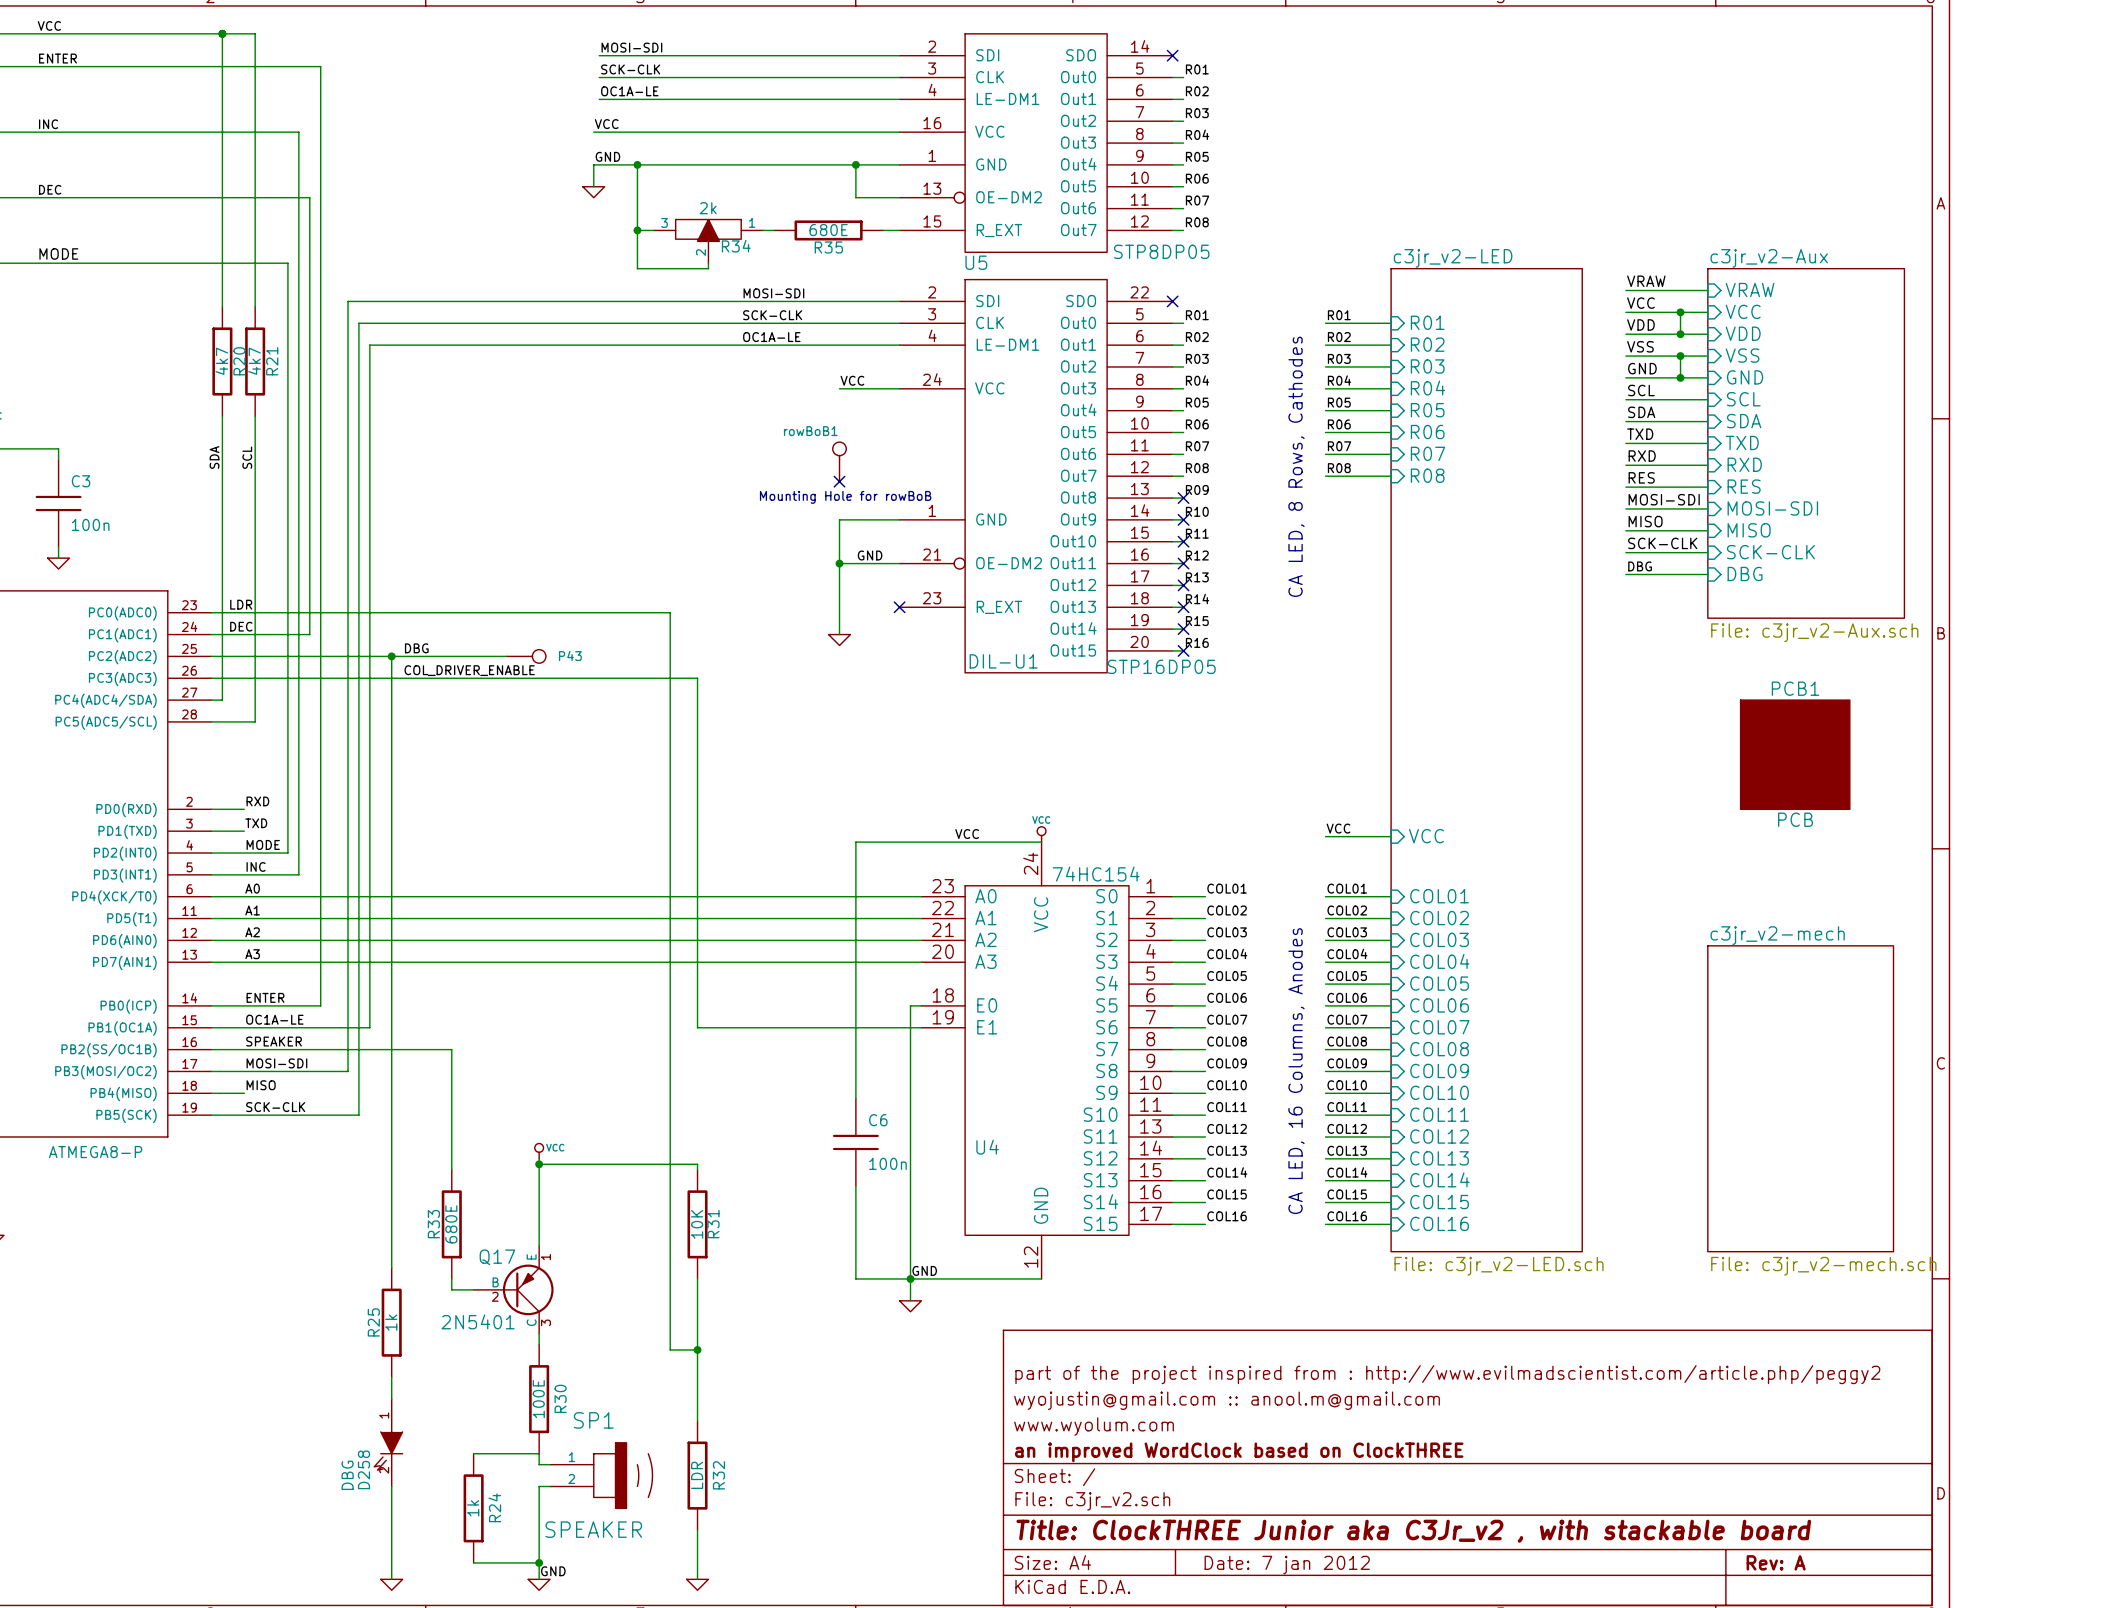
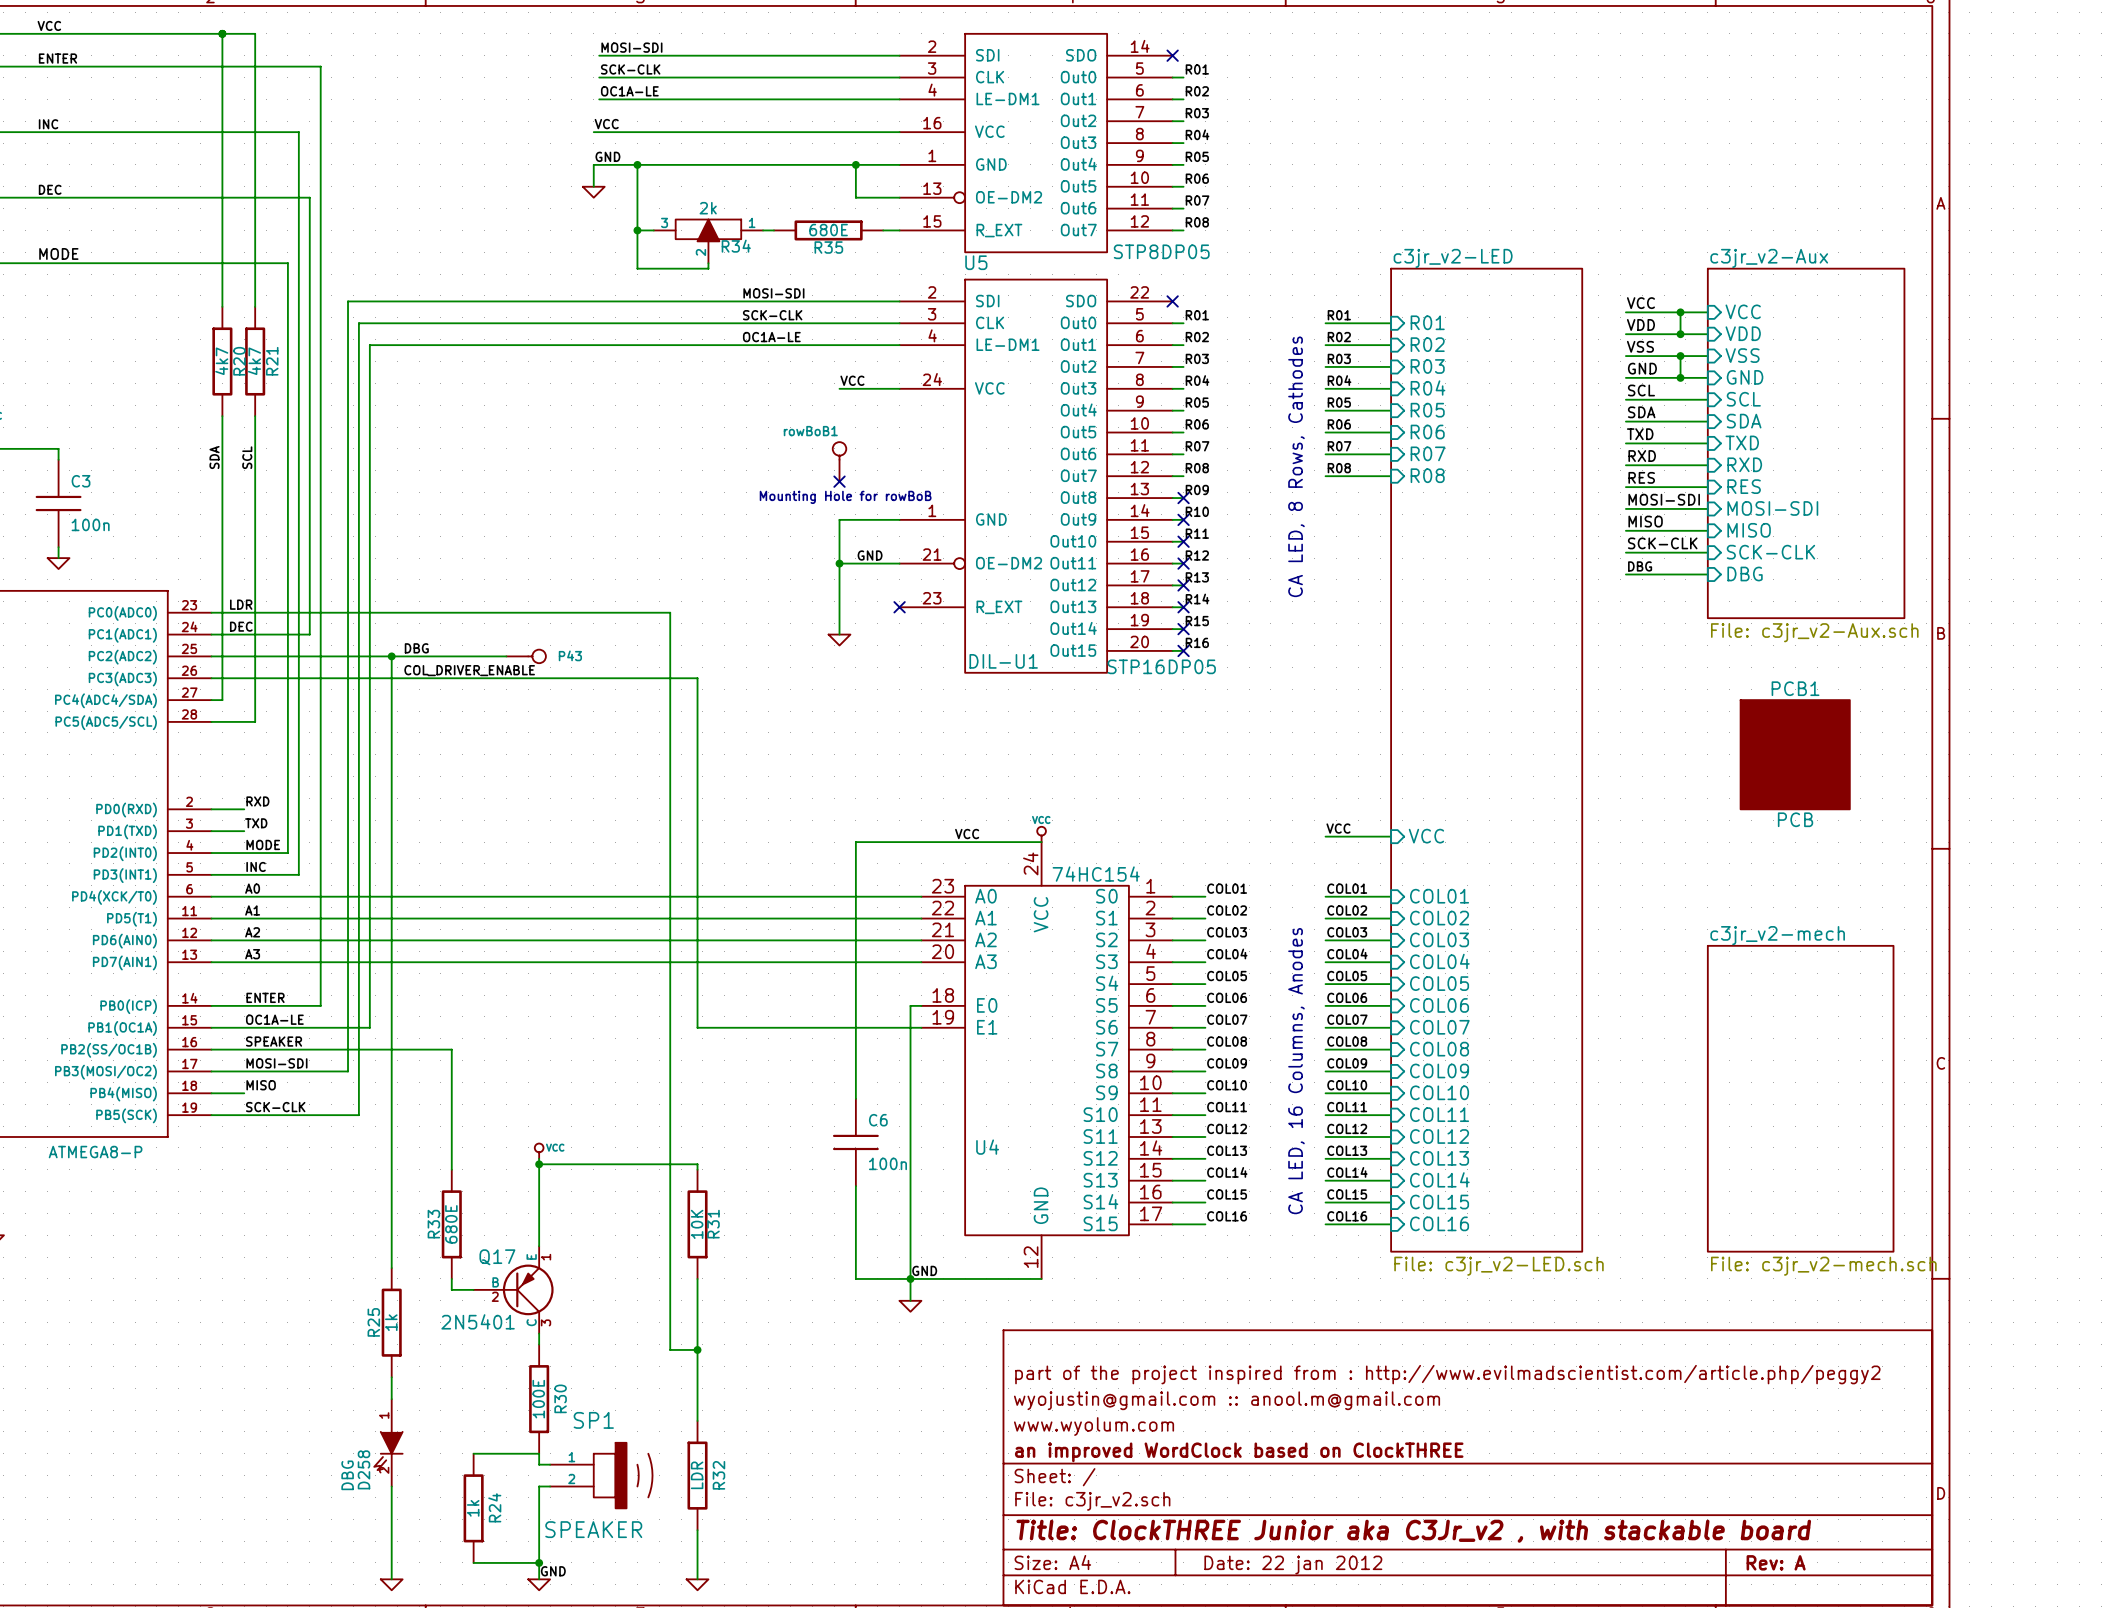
label: VRAW (1646, 281) -> none
wire: (1625, 290) (1707, 290) -> none
sheet pin: VRAW (1750, 290) -> none
title block: Date: 7 jan 2012 (1287, 1564) -> Date: 22 jan 2012 (1293, 1564)

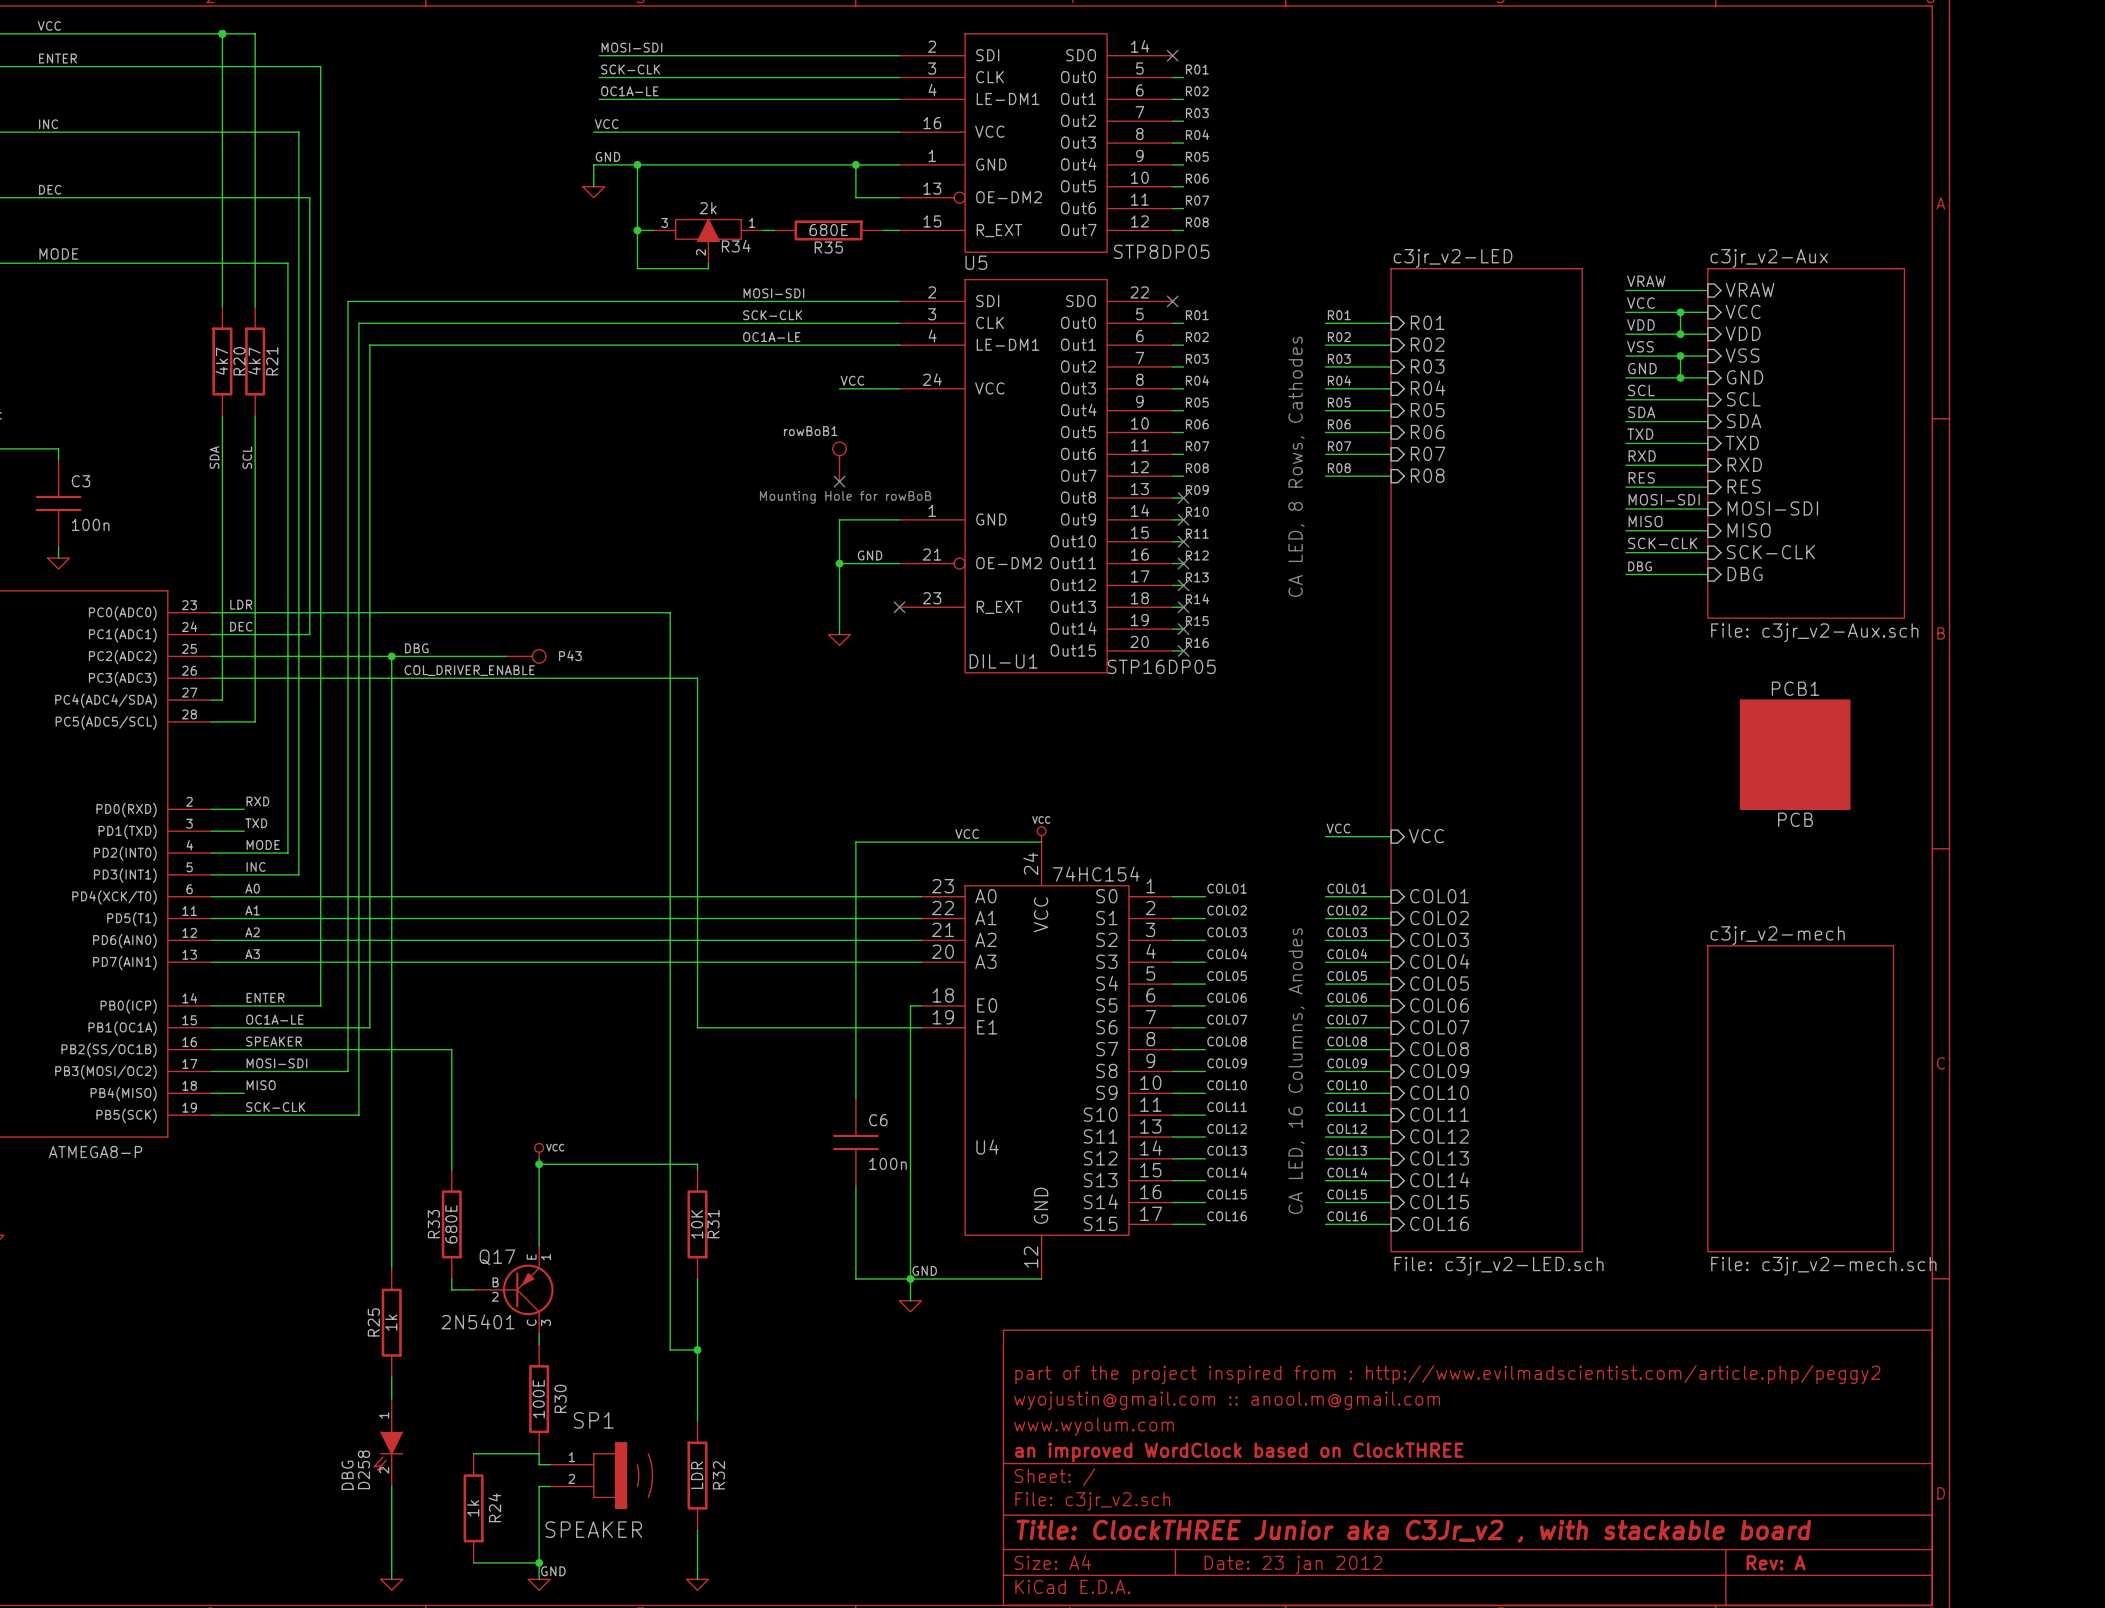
label: none -> VRAW (1646, 281)
wire: none -> (1625, 290) (1707, 290)
sheet pin: none -> VRAW (1750, 290)
title block: Date: 22 jan 2012 (1293, 1564) -> Date: 23 jan 2012 (1293, 1564)

